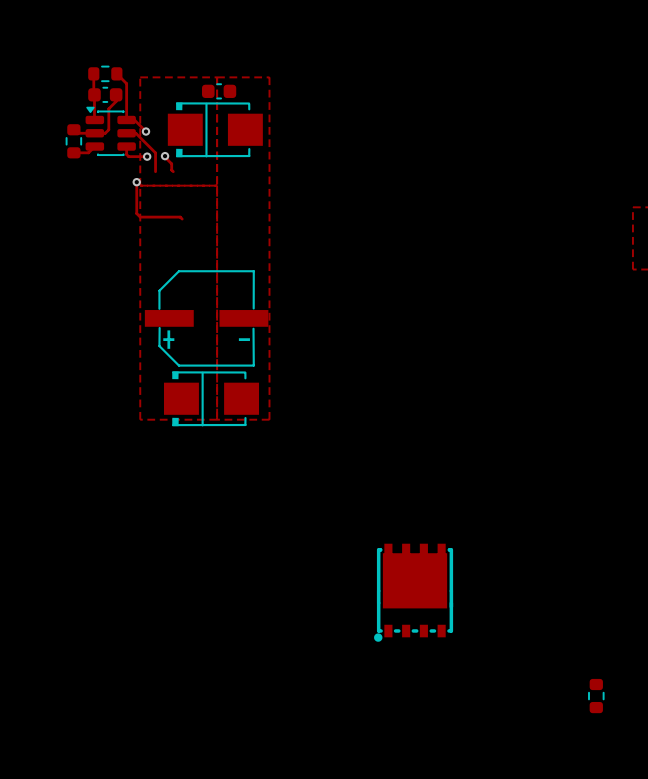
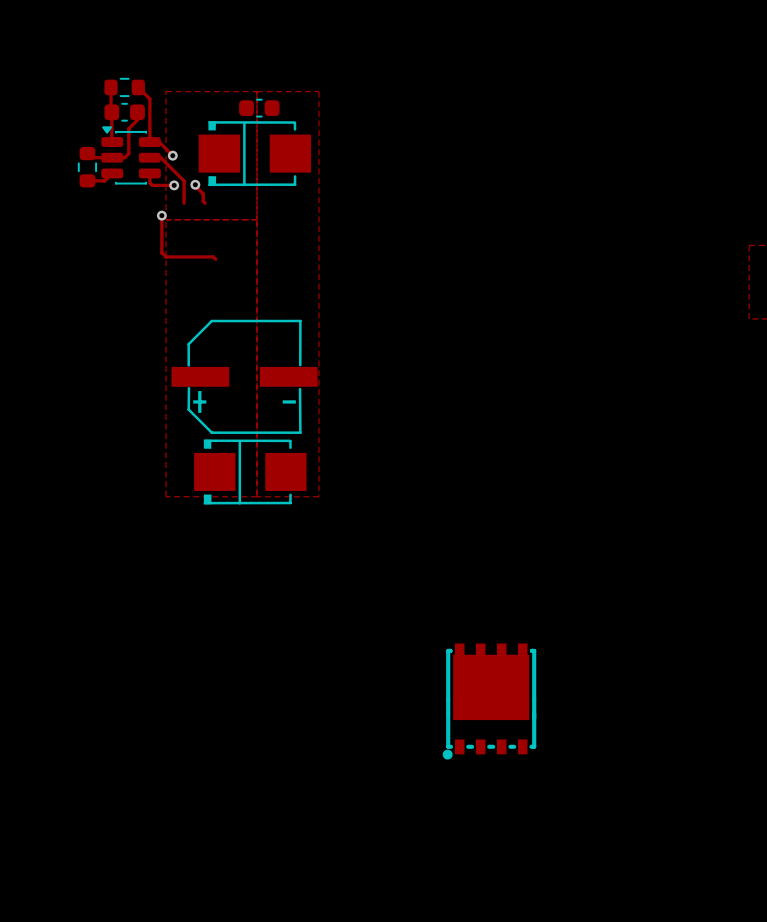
part: (596, 696) -> none

